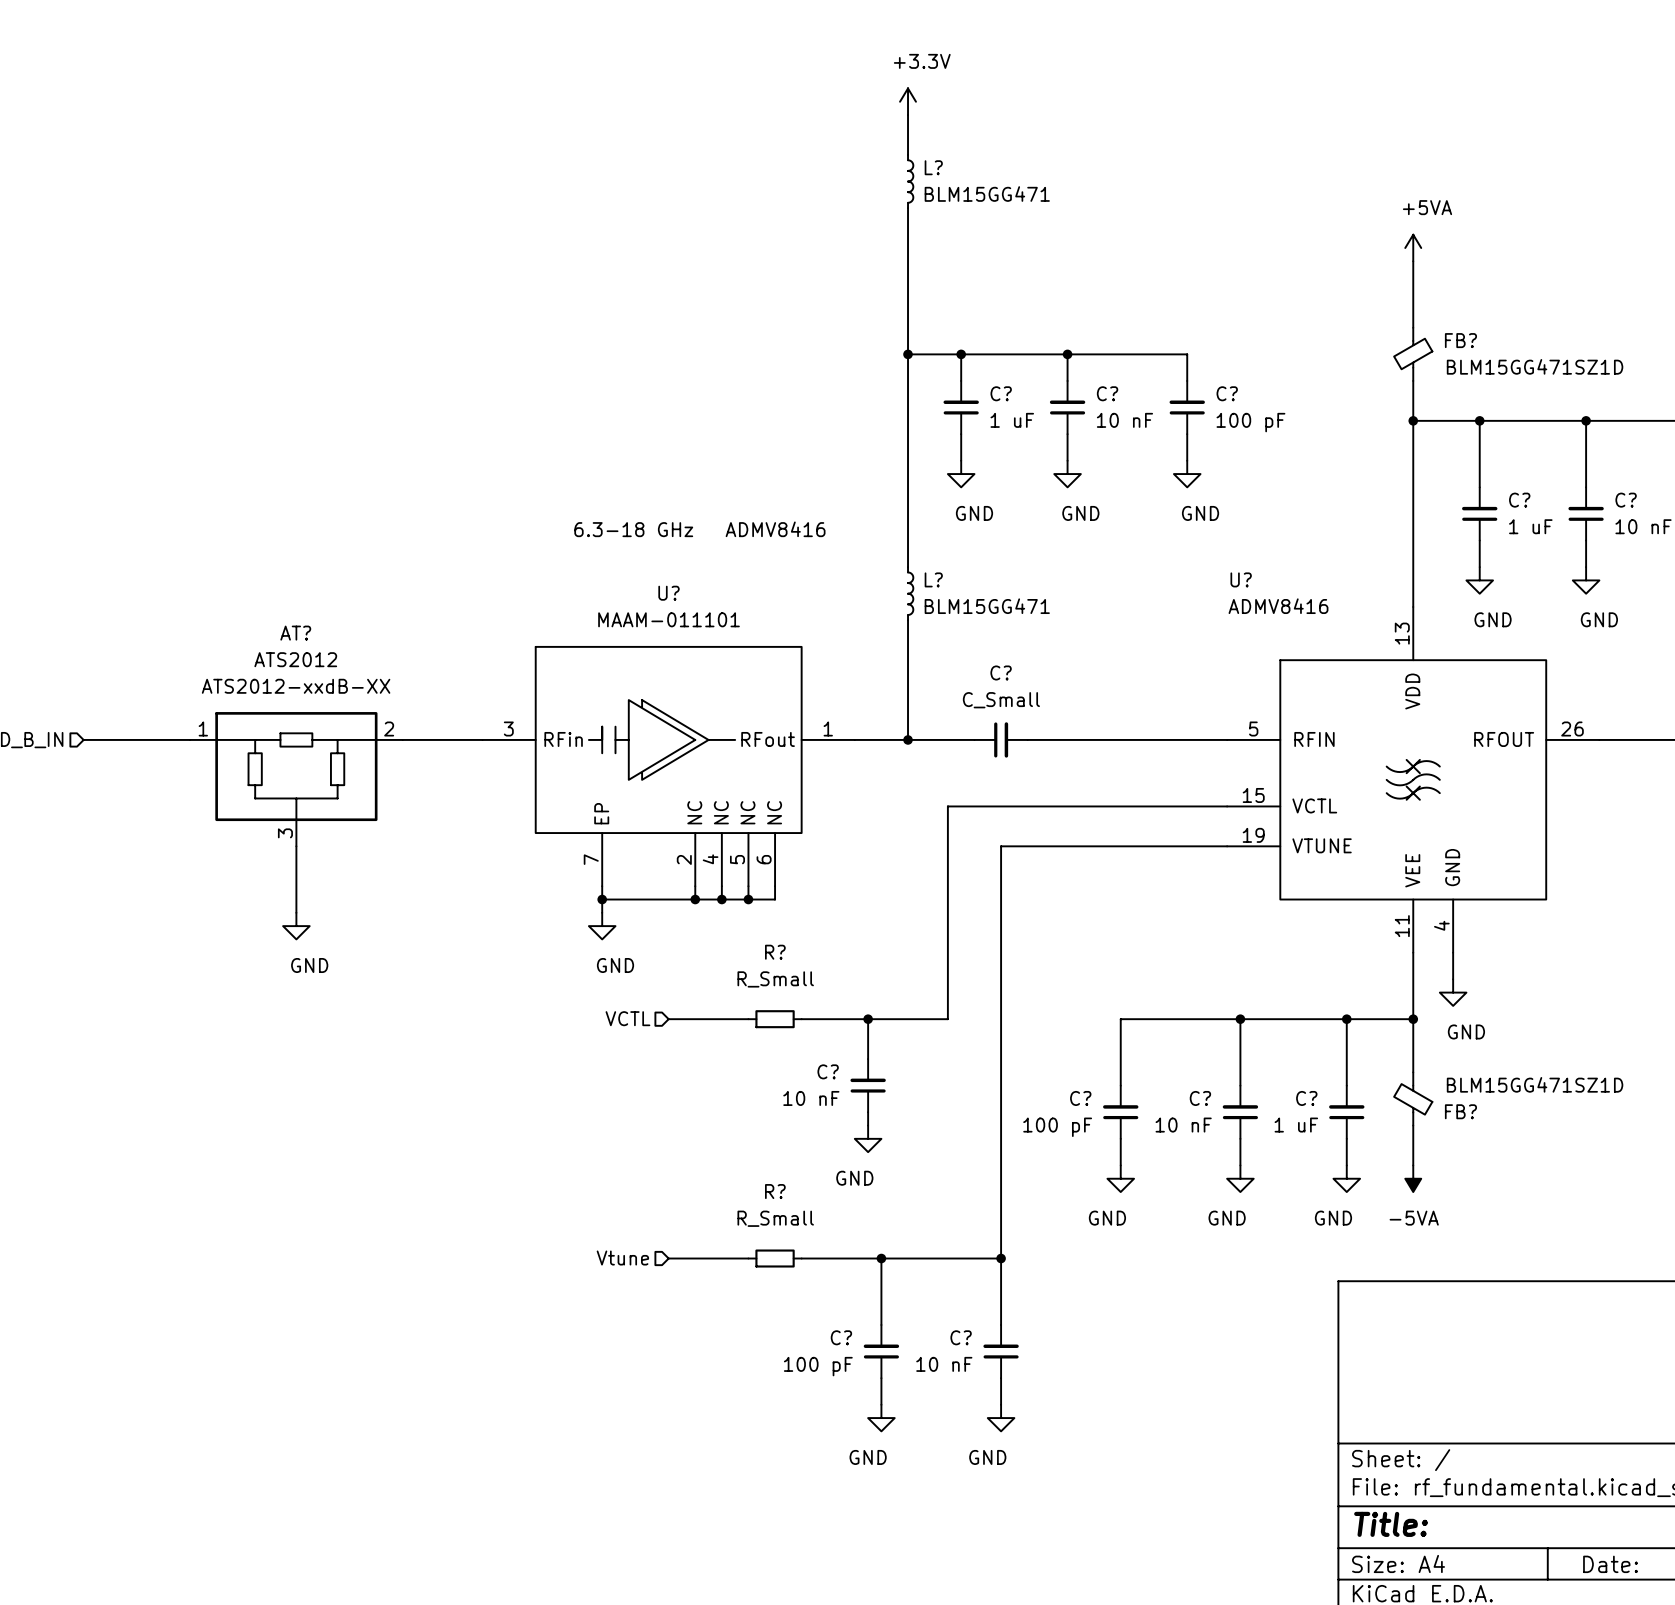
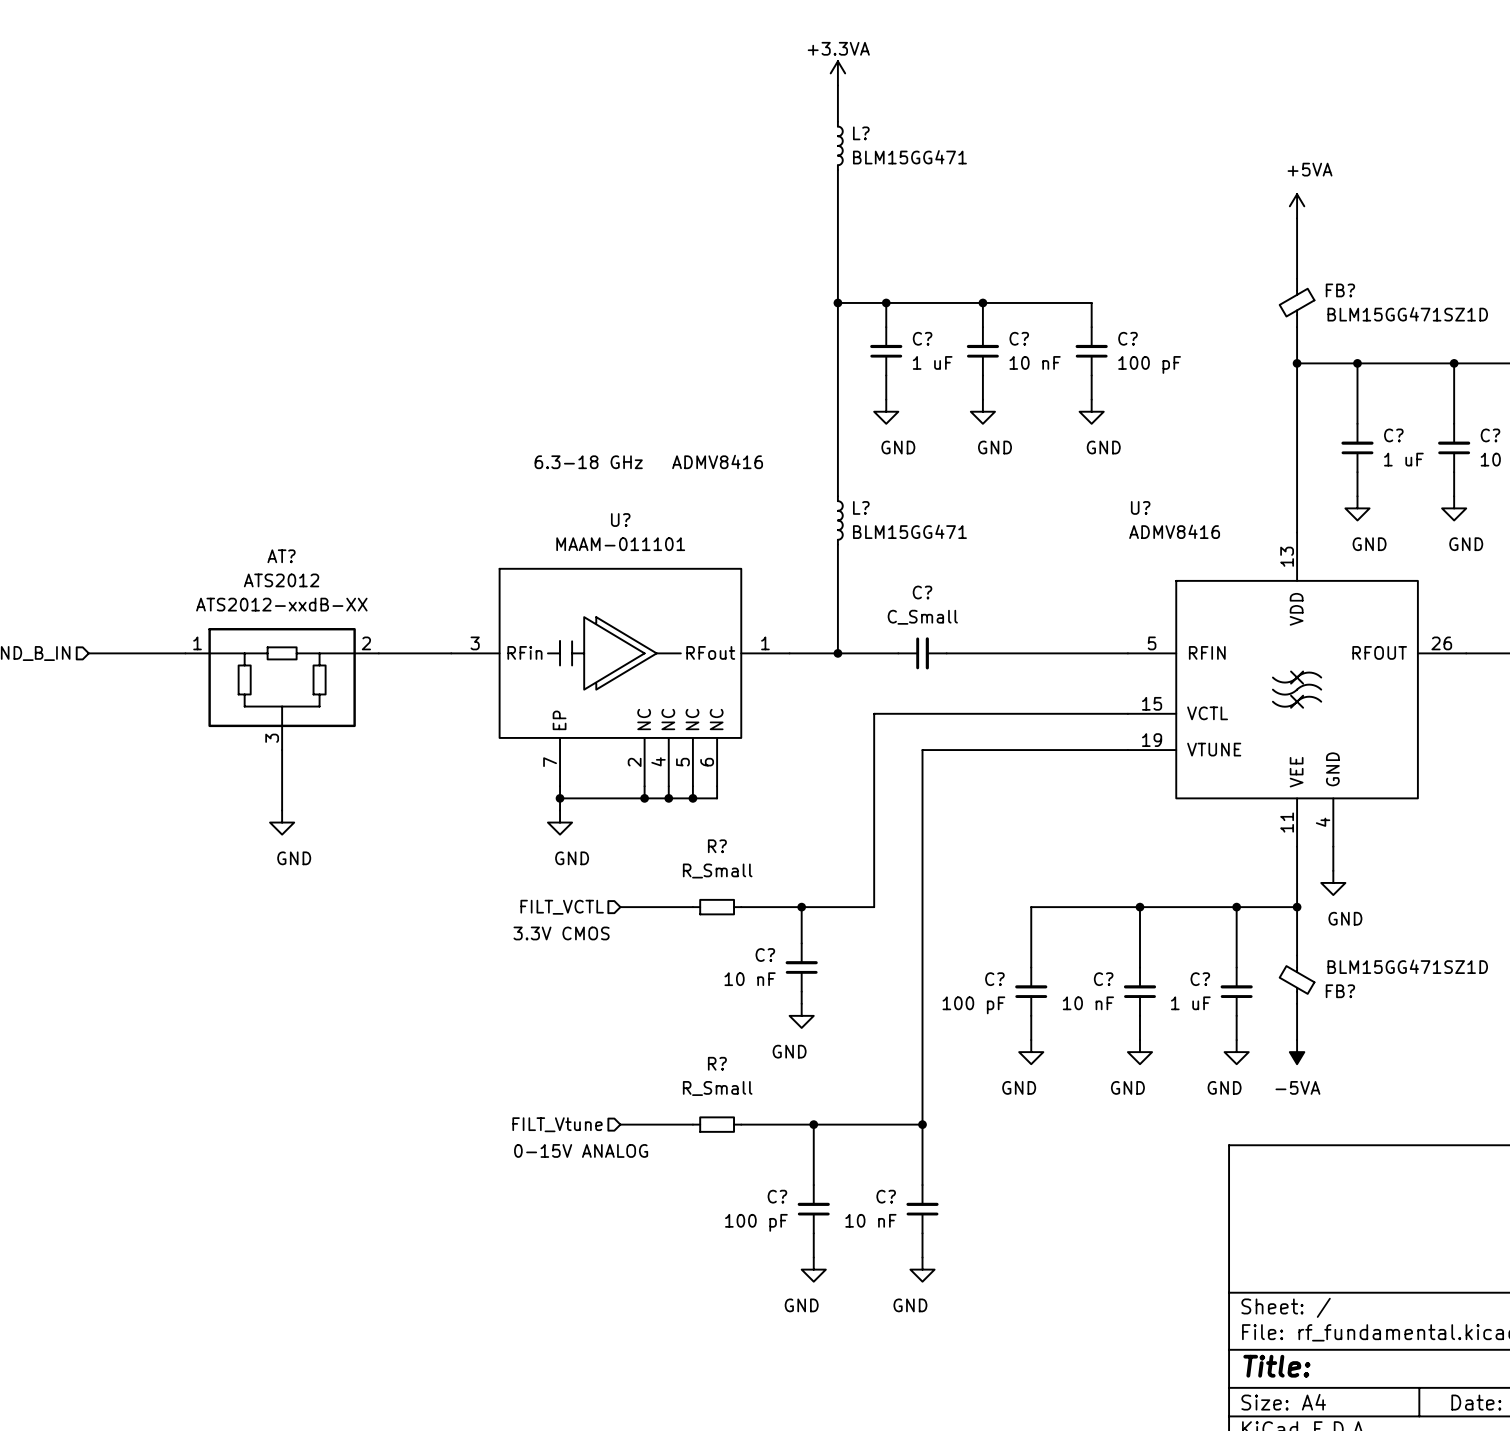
power symbol: +3.3V (908, 101) -> +3.3VA (837, 73)
hierarchical label: VCTL (627, 1018) -> FILT_VCTL (562, 907)
text: none -> 3.3V CMOS (561, 933)
hierarchical label: Vtune (622, 1258) -> FILT_Vtune (557, 1124)
text: none -> 0-15V ANALOG (581, 1150)

